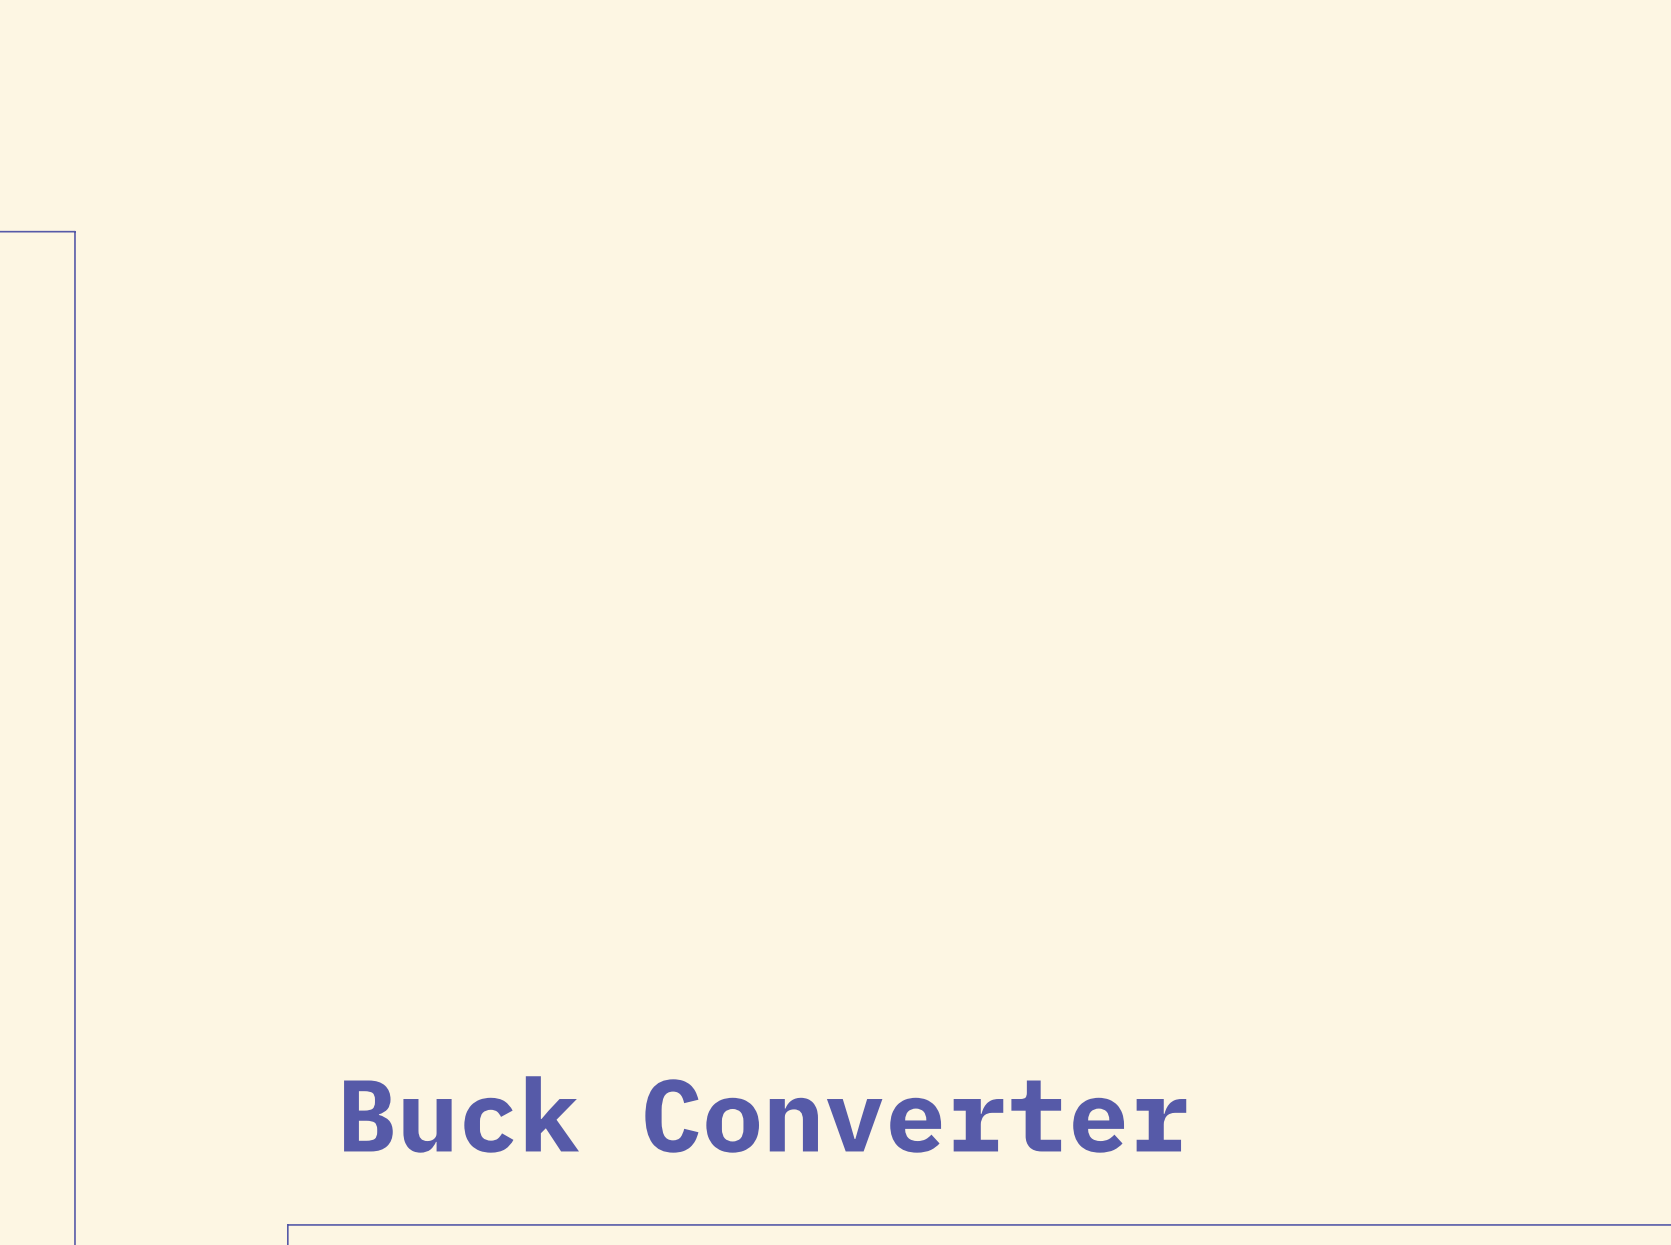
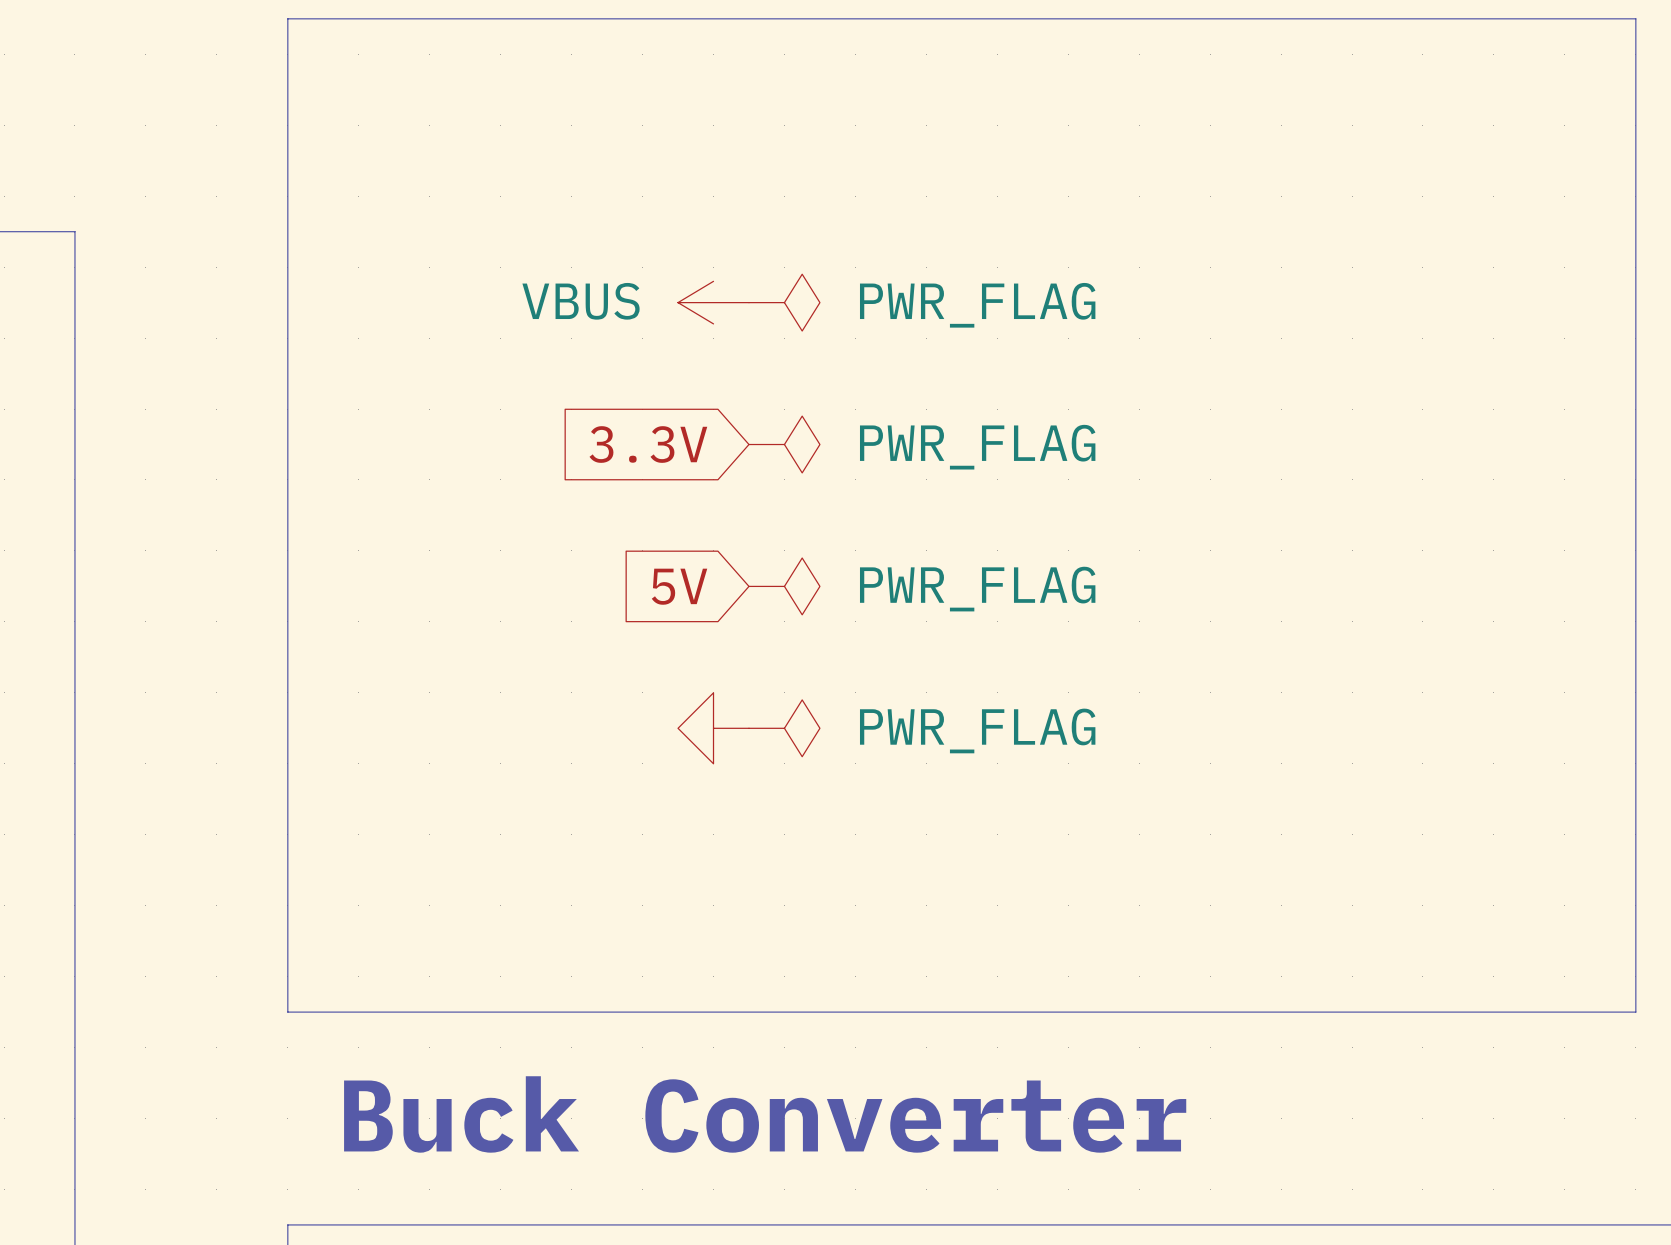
line: none -> (287, 18) (1635, 18) (1635, 1012) (287, 1012) (287, 18)
power symbol: none -> VBUS (713, 302)
power symbol: none -> PWR_FLAG (784, 302)
global label: none -> 3.3V (648, 444)
power symbol: none -> PWR_FLAG (784, 444)
global label: none -> 5V (679, 586)
power symbol: none -> PWR_FLAG (784, 586)
power symbol: none -> (713, 728)
power symbol: none -> PWR_FLAG (784, 728)

